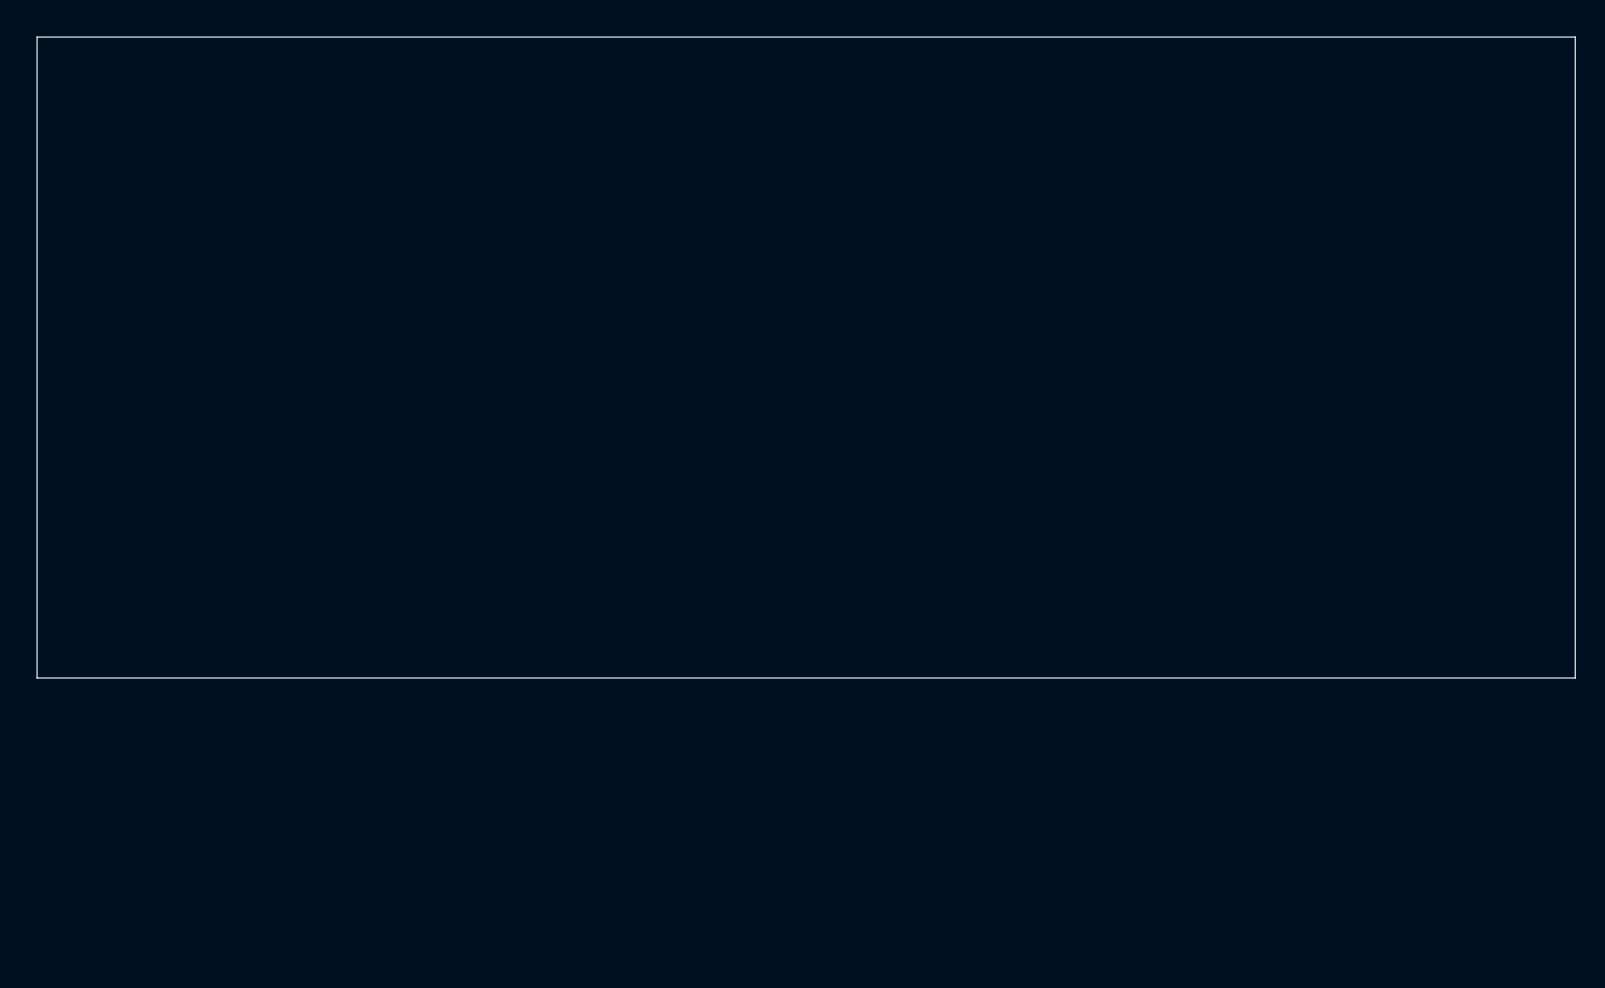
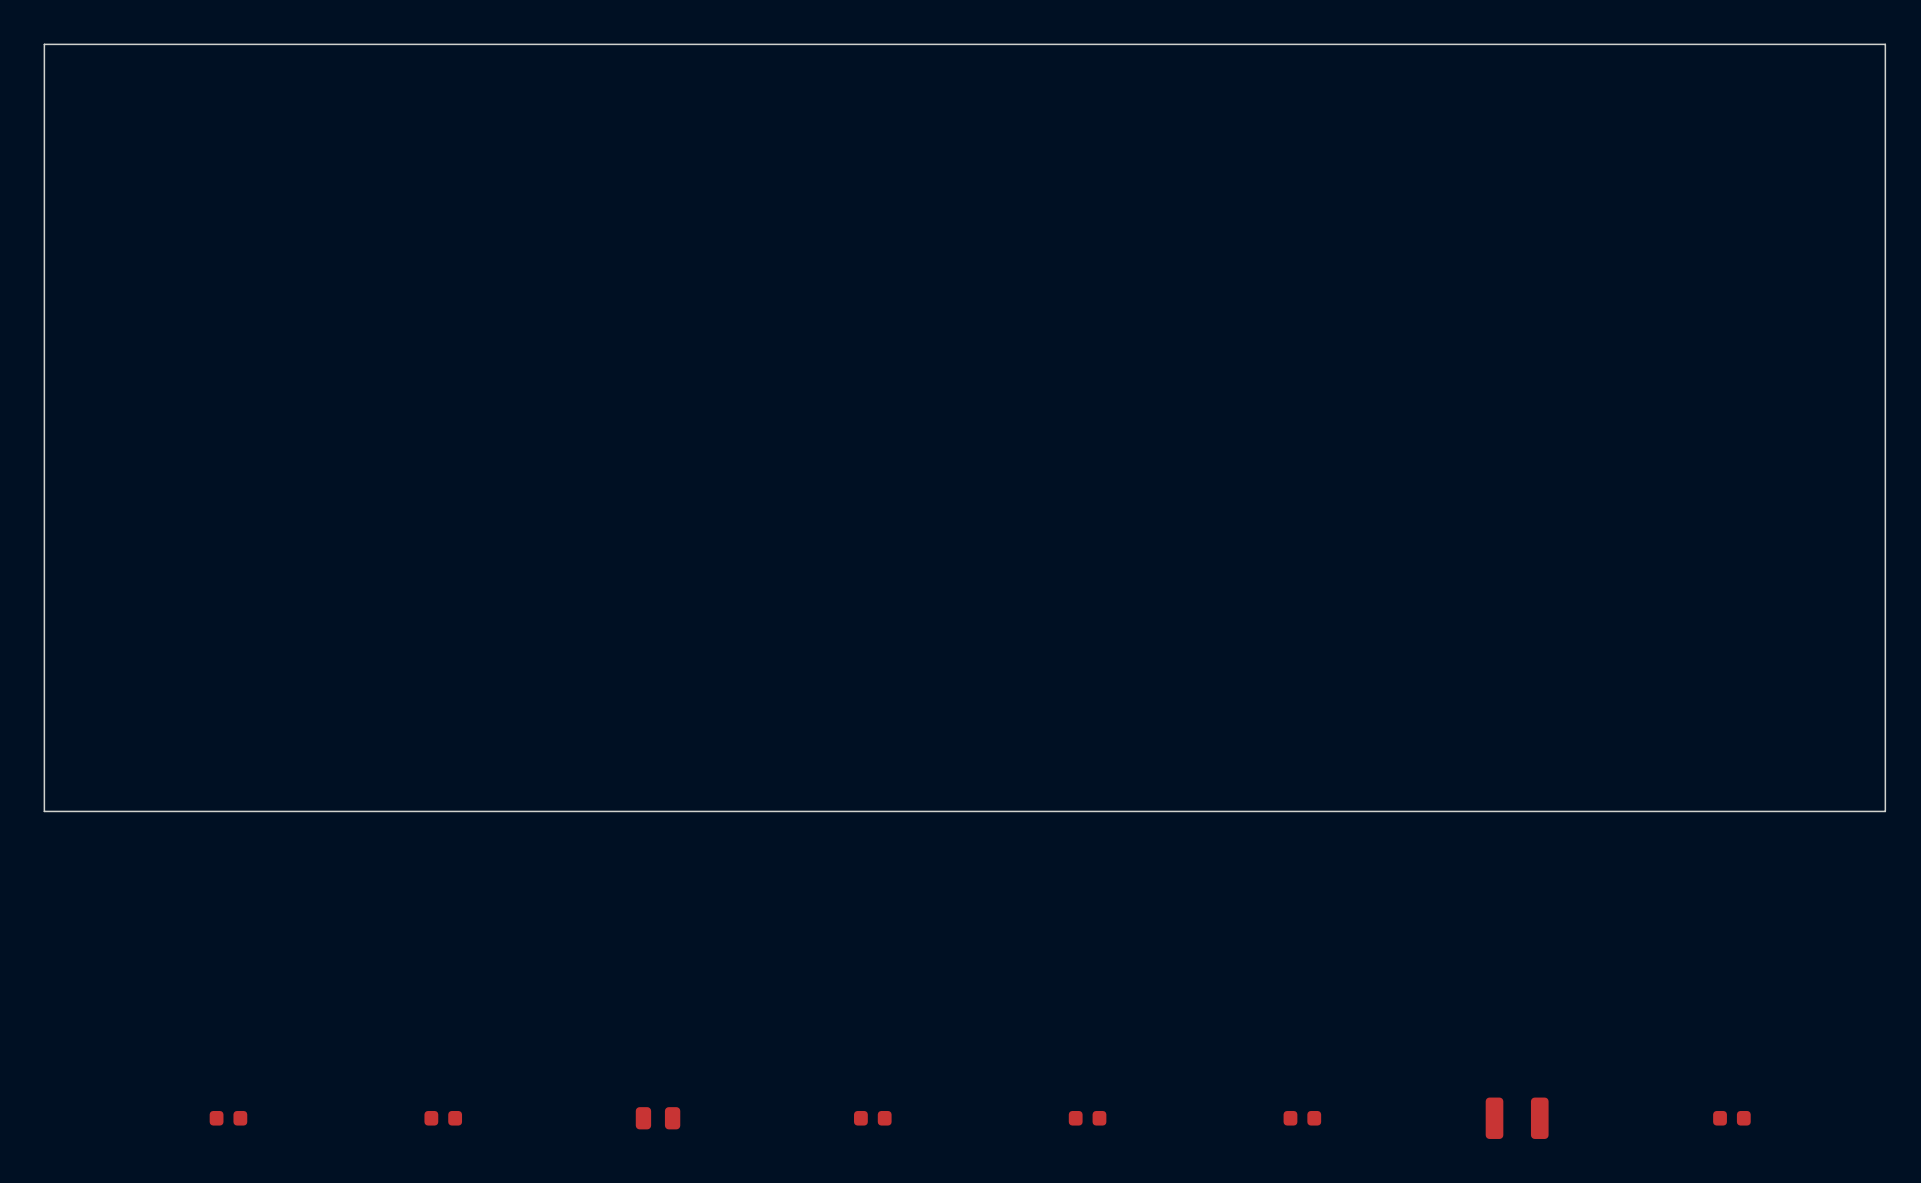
part: none -> (228, 1118)
part: none -> (443, 1118)
part: none -> (658, 1118)
part: none -> (872, 1118)
part: none -> (1087, 1118)
part: none -> (1302, 1118)
part: none -> (1517, 1118)
part: none -> (1731, 1118)

